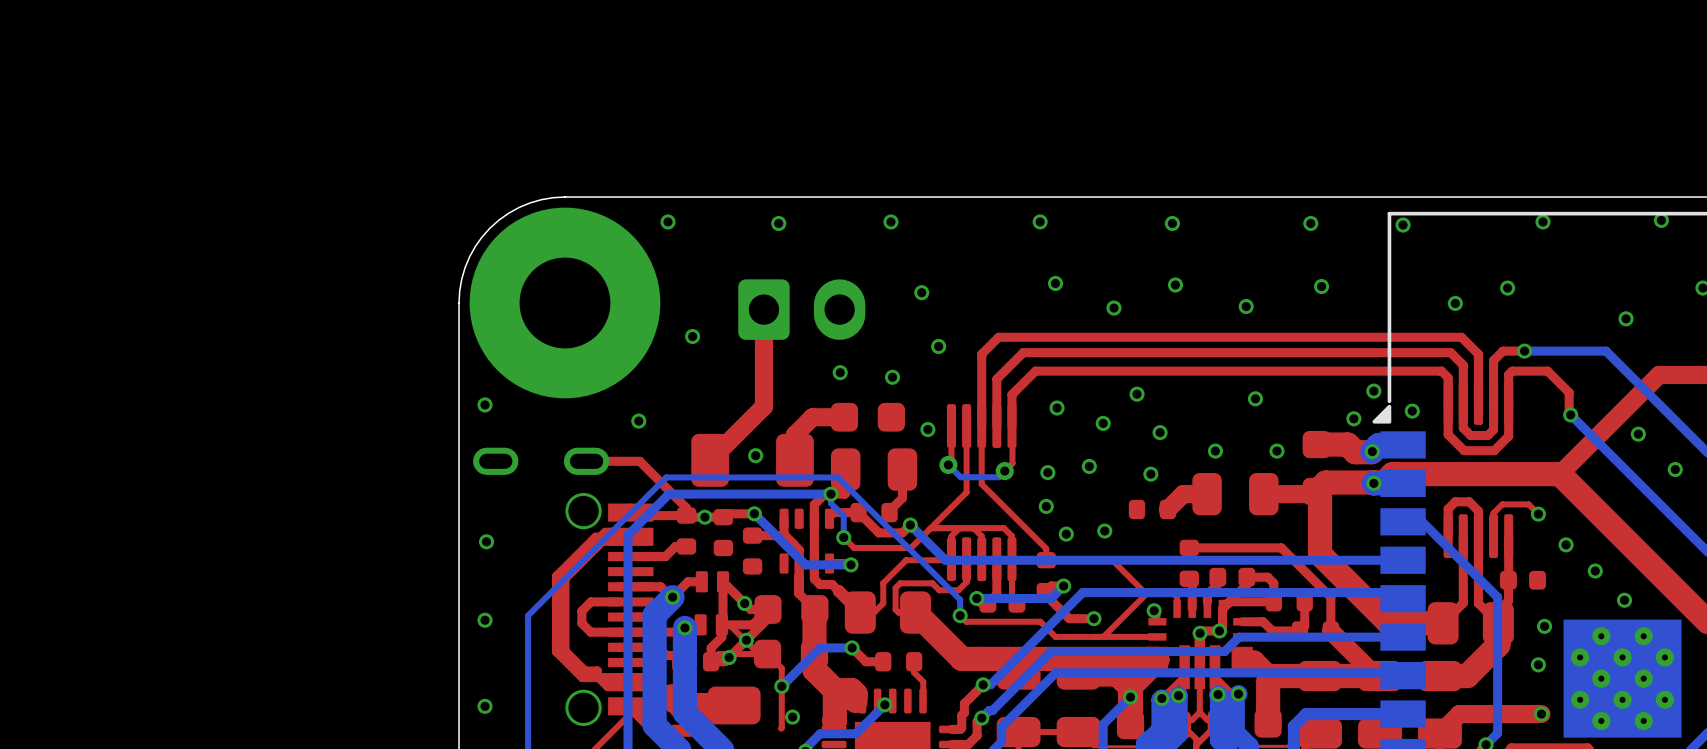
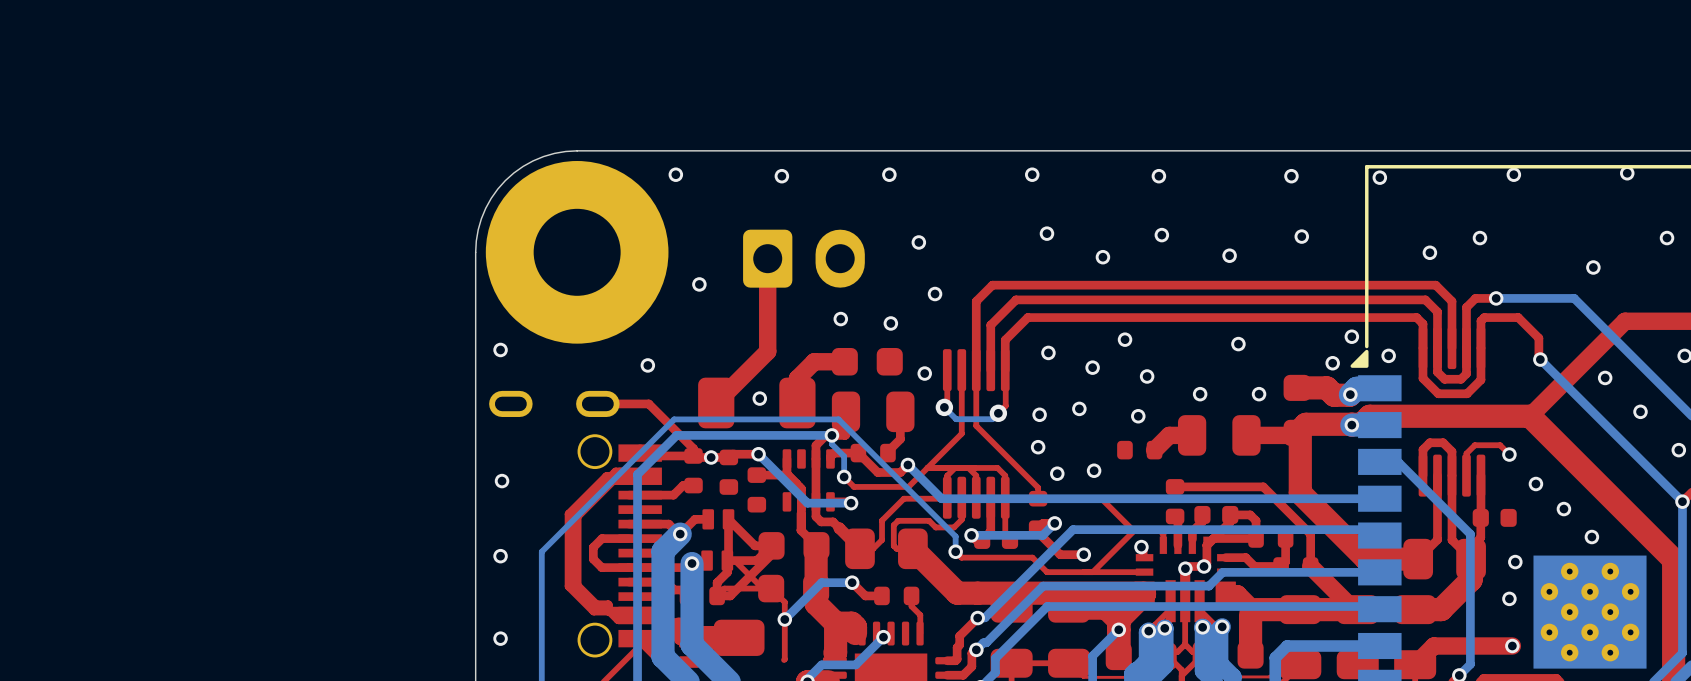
via: (744, 603) -> none
via: (746, 640) -> none
via: (729, 657) -> none
via: (792, 717) -> none

